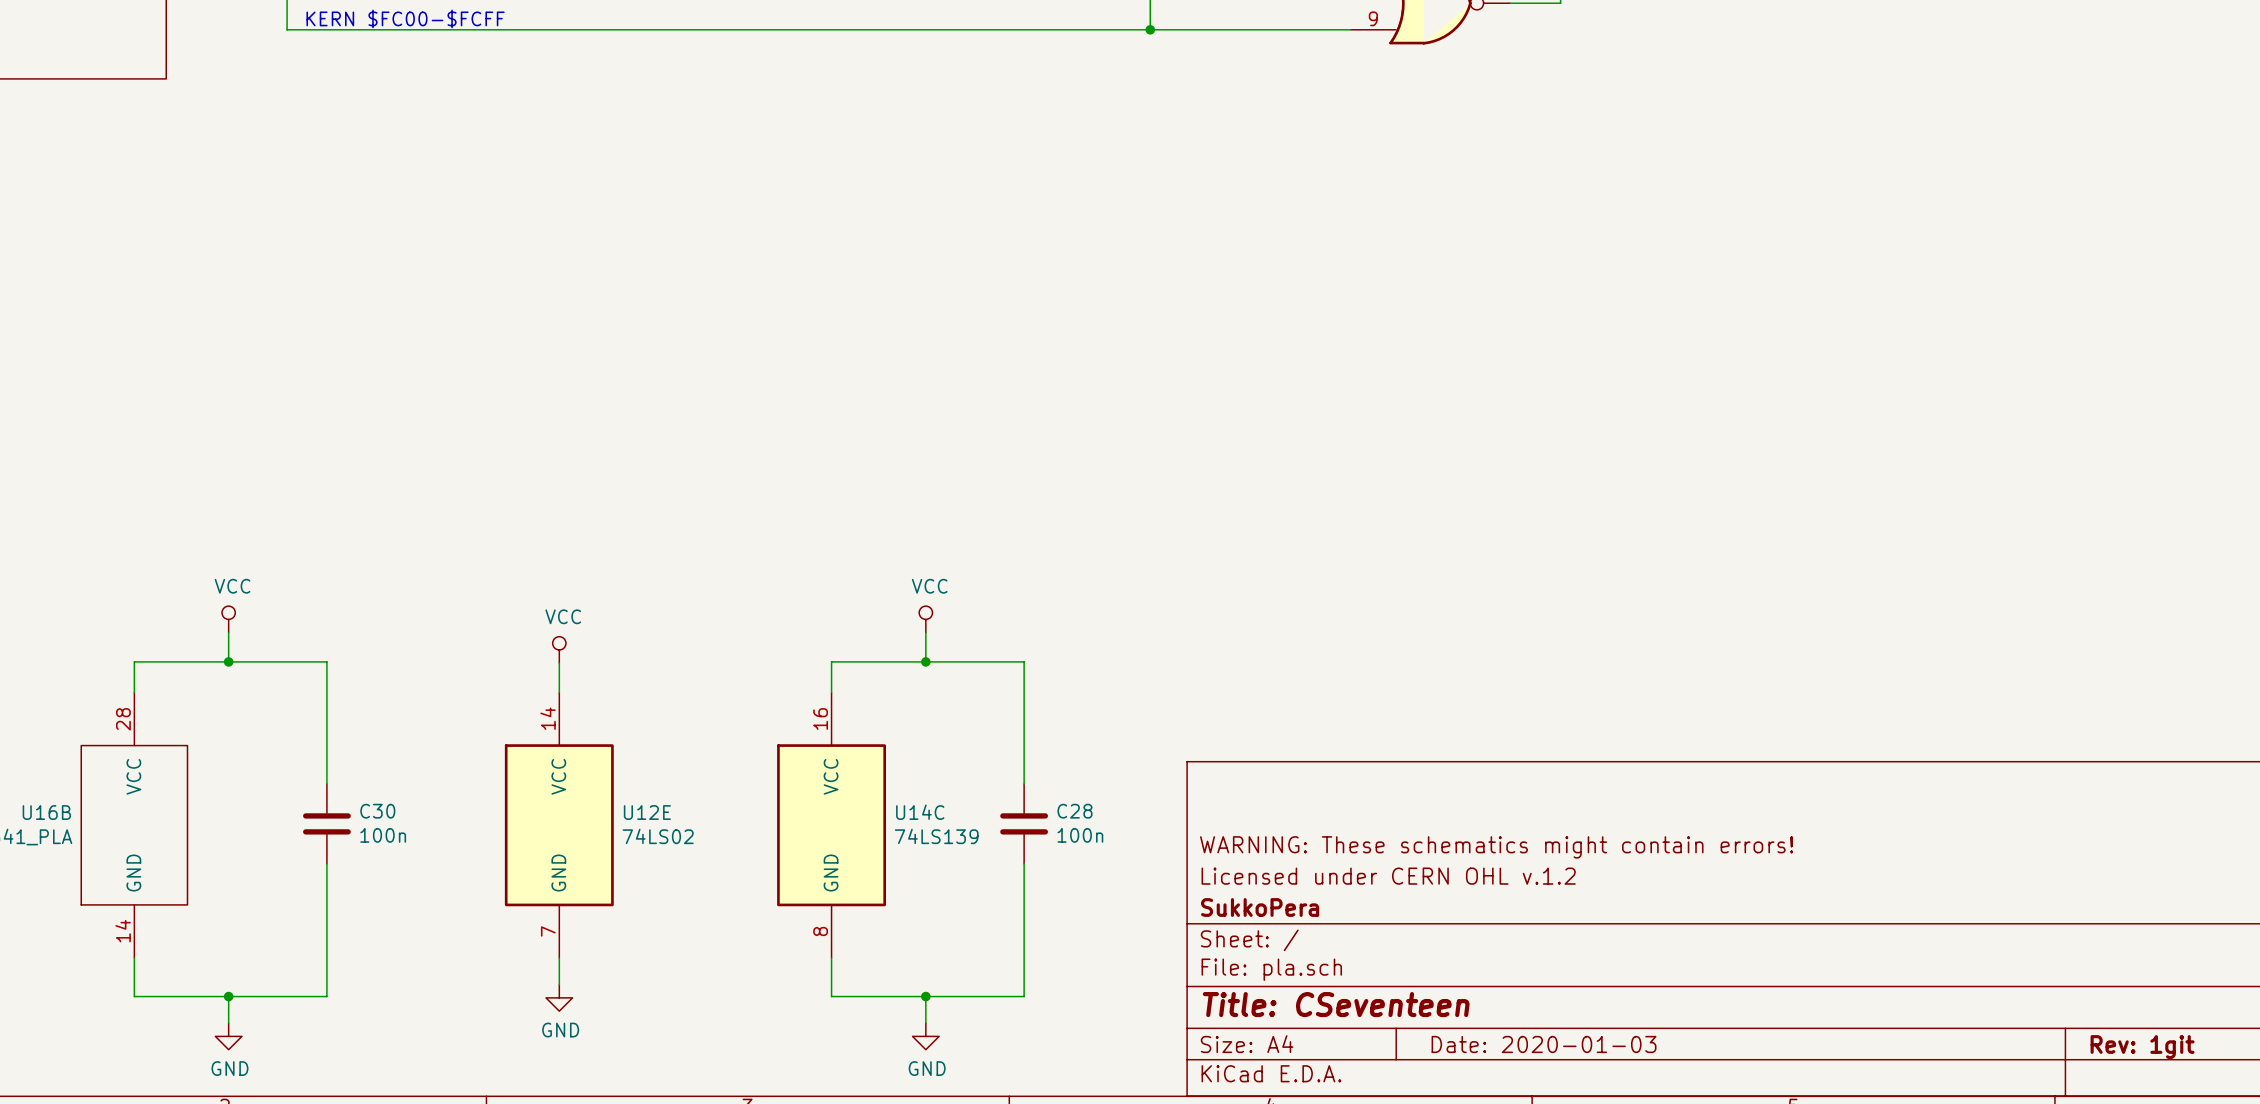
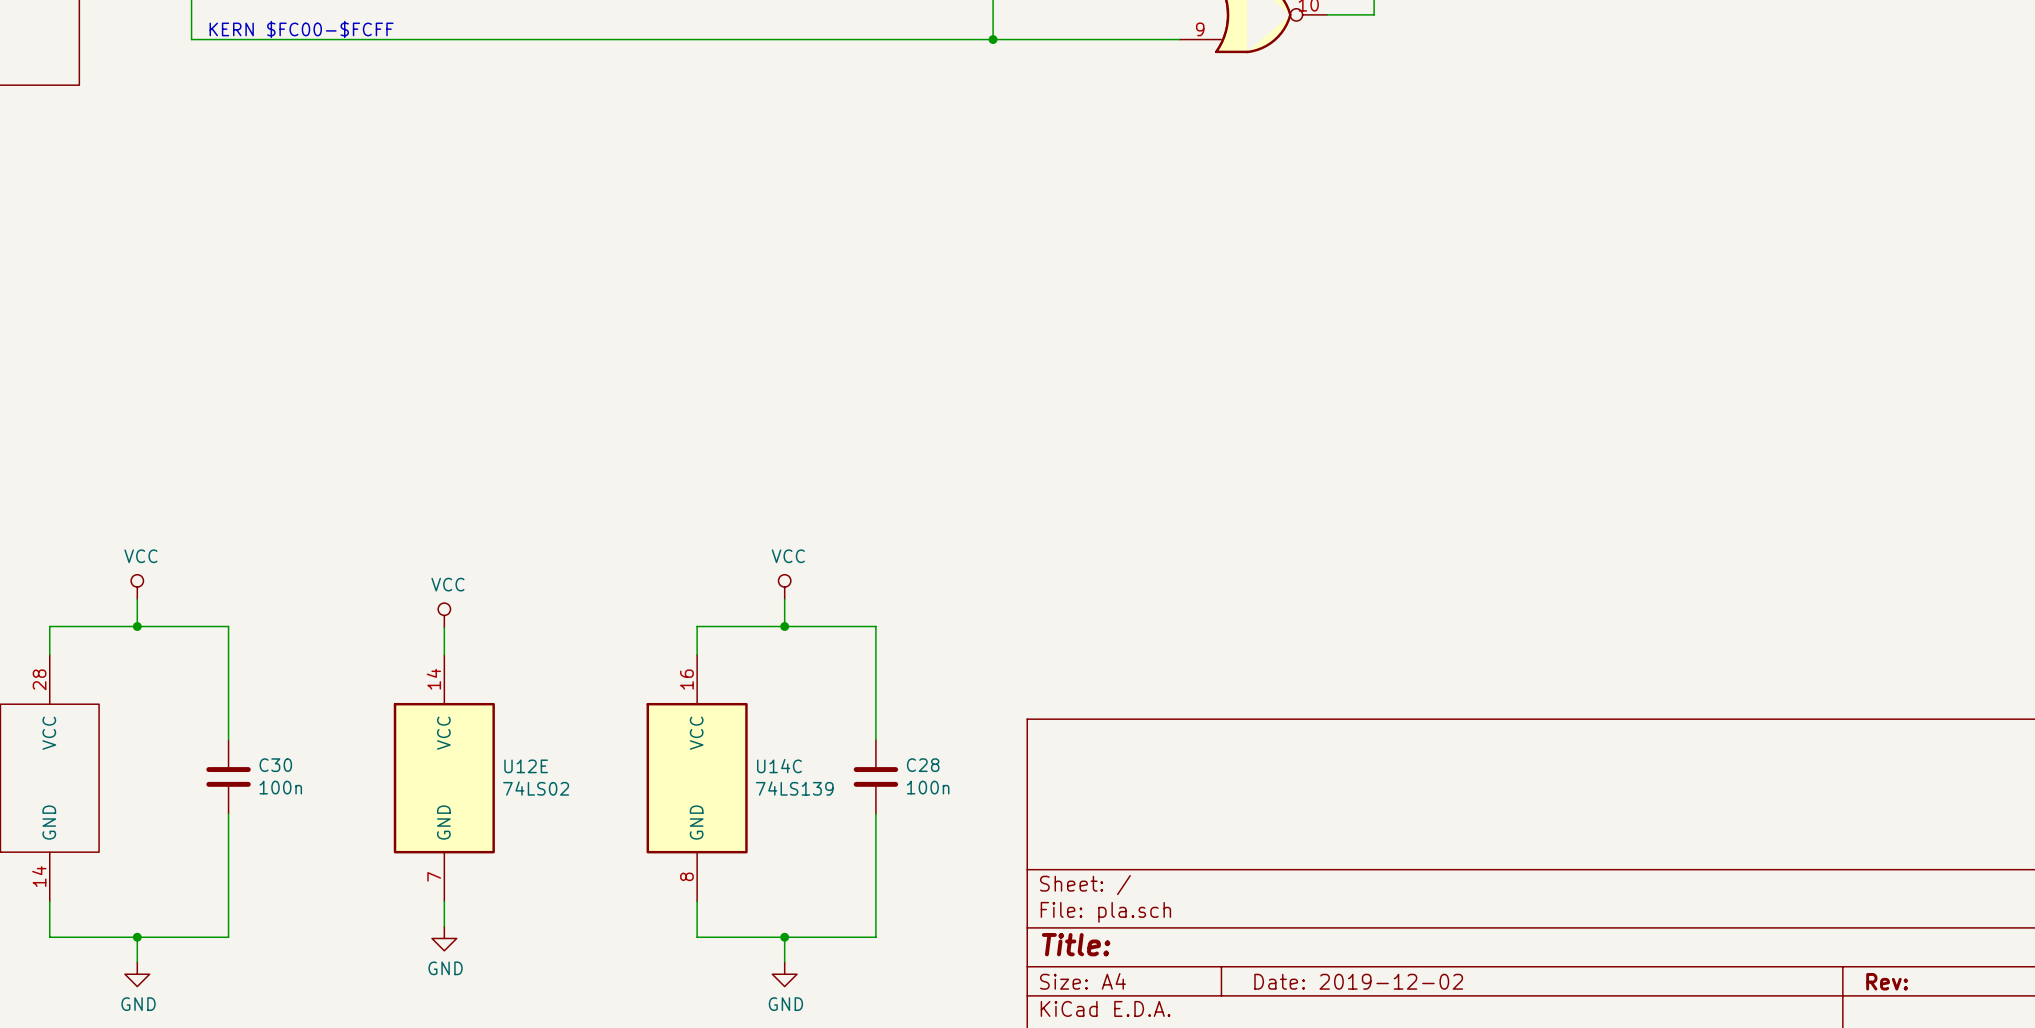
title block: WARNING: These schematics might contain errors! (1496, 847) -> none
title block: Licensed under CERN OHL v.1.2 (1388, 876) -> none
title block: SukkoPera (1260, 907) -> none
title block: Title: CSeventeen (1336, 1004) -> Title: (1076, 944)
title block: Date: 2020-01-03 (1544, 1044) -> Date: 2019-12-02 (1358, 981)
title block: Rev: 1git (2142, 1047) -> Rev: (1887, 981)

